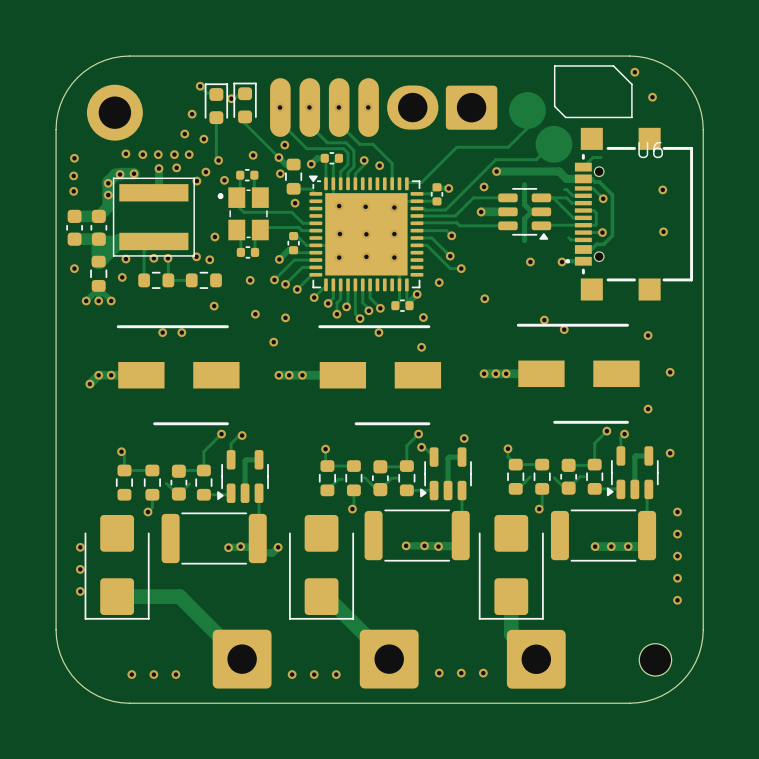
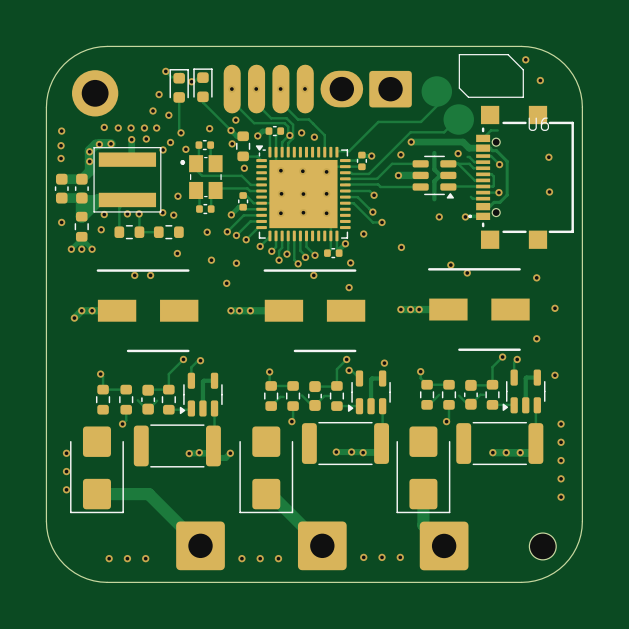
track: (364, 160) (364, 164) (355, 173) (355, 183) -> none
via: none -> (289, 135)
via: none -> (458, 153)

